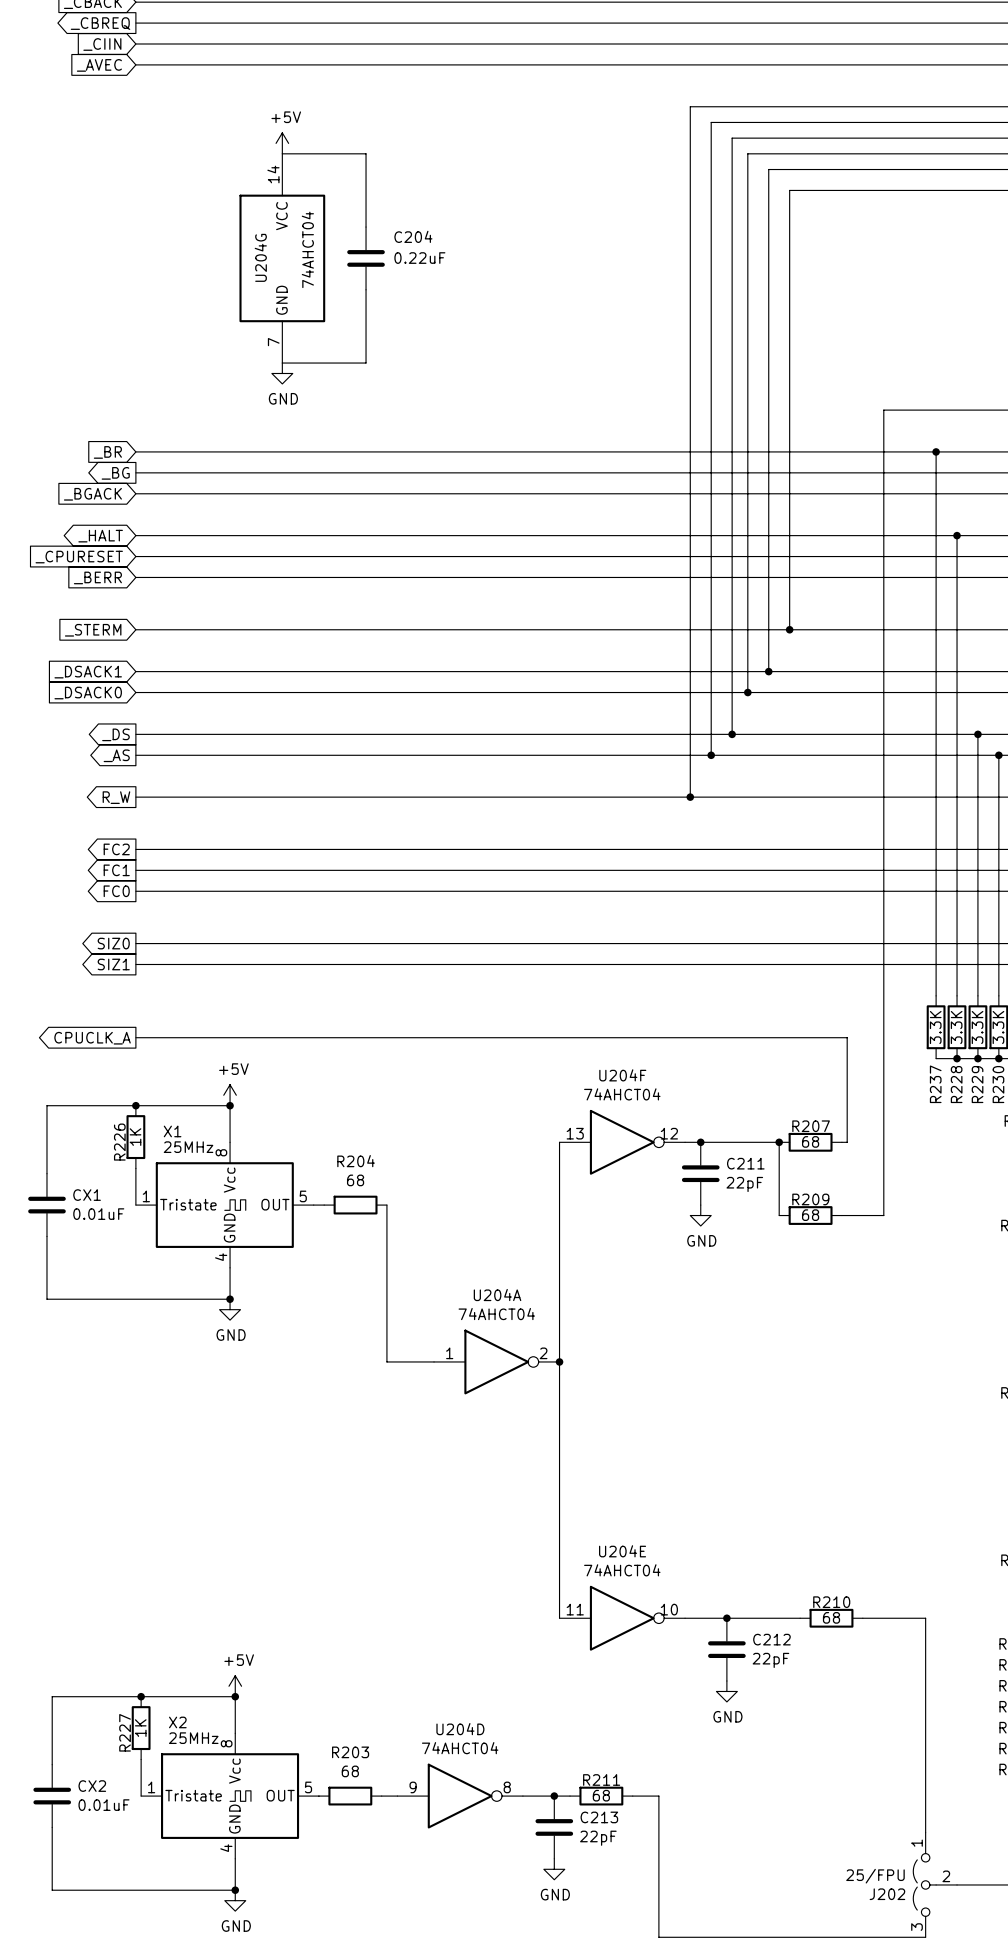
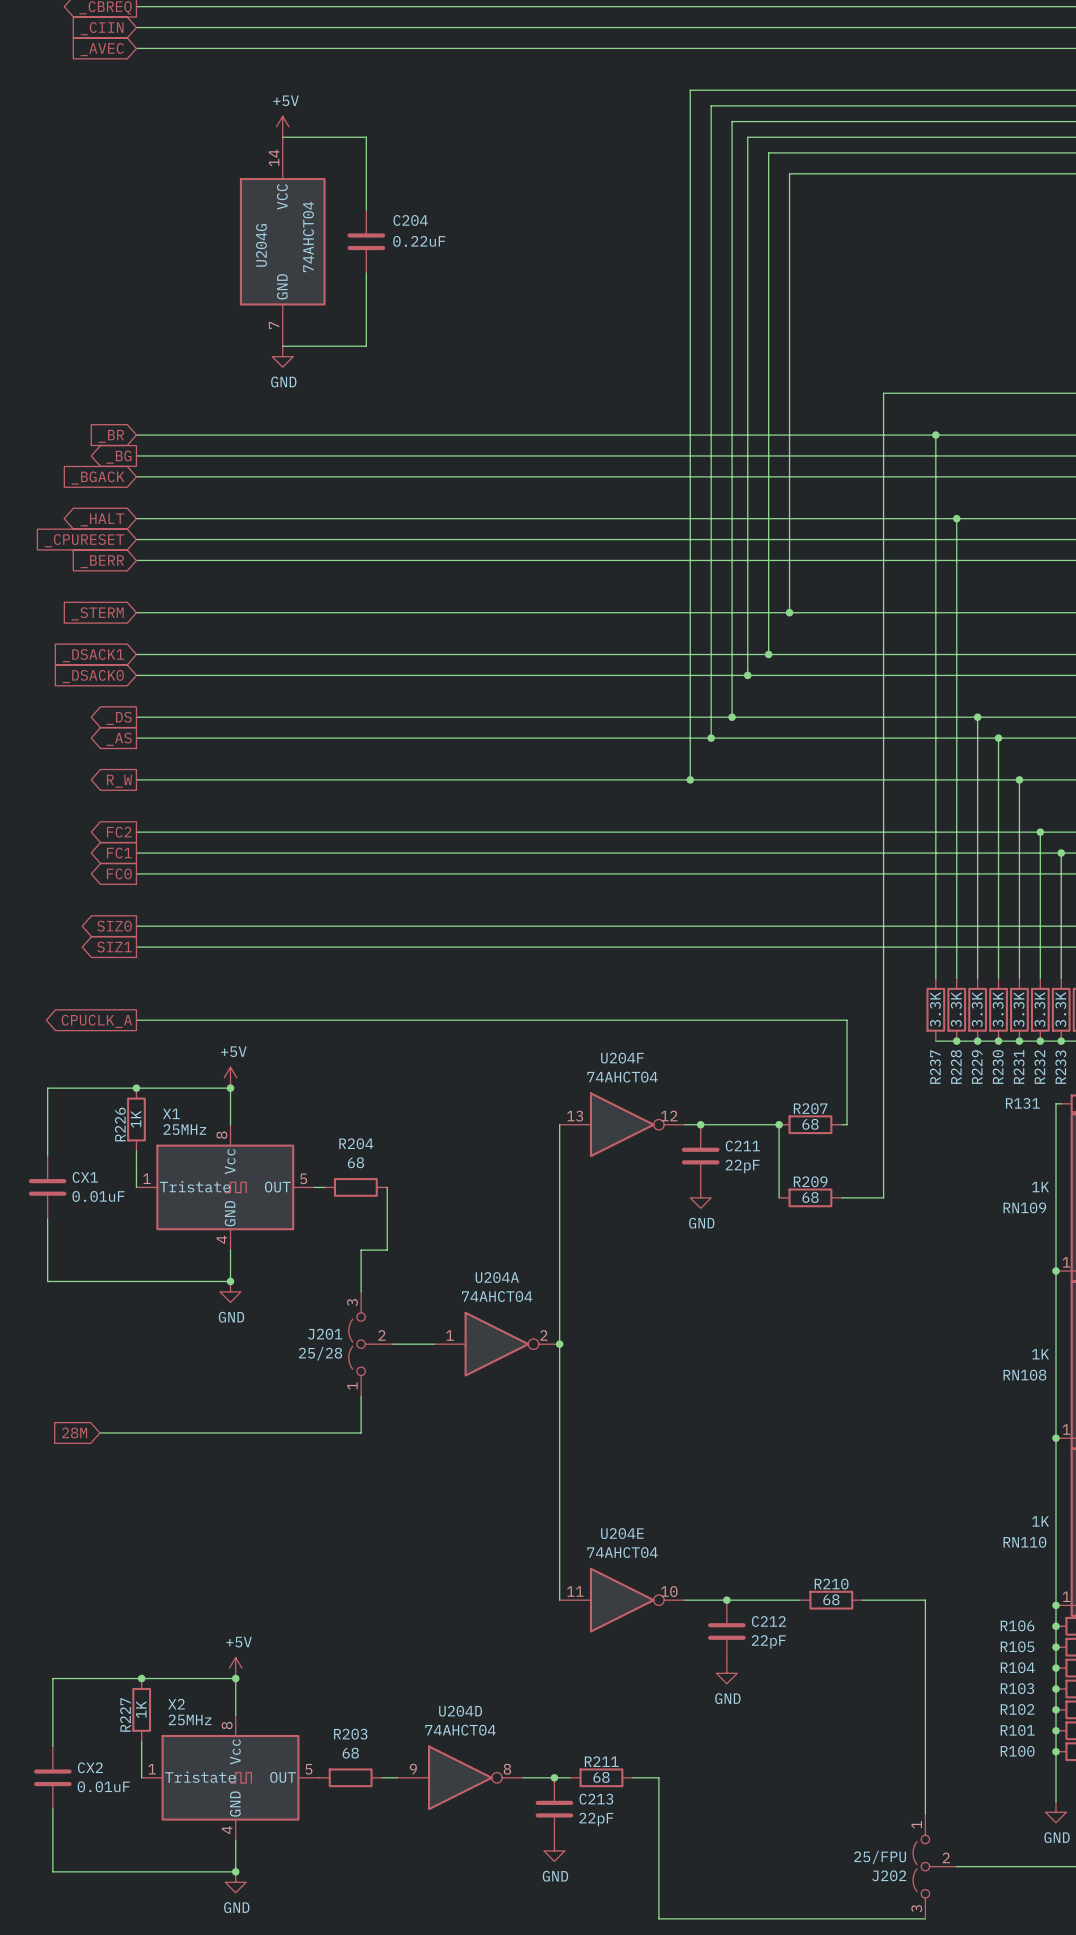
wire: (386, 1267) (386, 1361) (392, 1361) -> (387, 1250) (361, 1250) (361, 1291)
J201: none -> 25/28 (370, 1344)
wire: none -> (361, 1396) (361, 1432) (99, 1432)
global label: none -> 28M (74, 1432)

